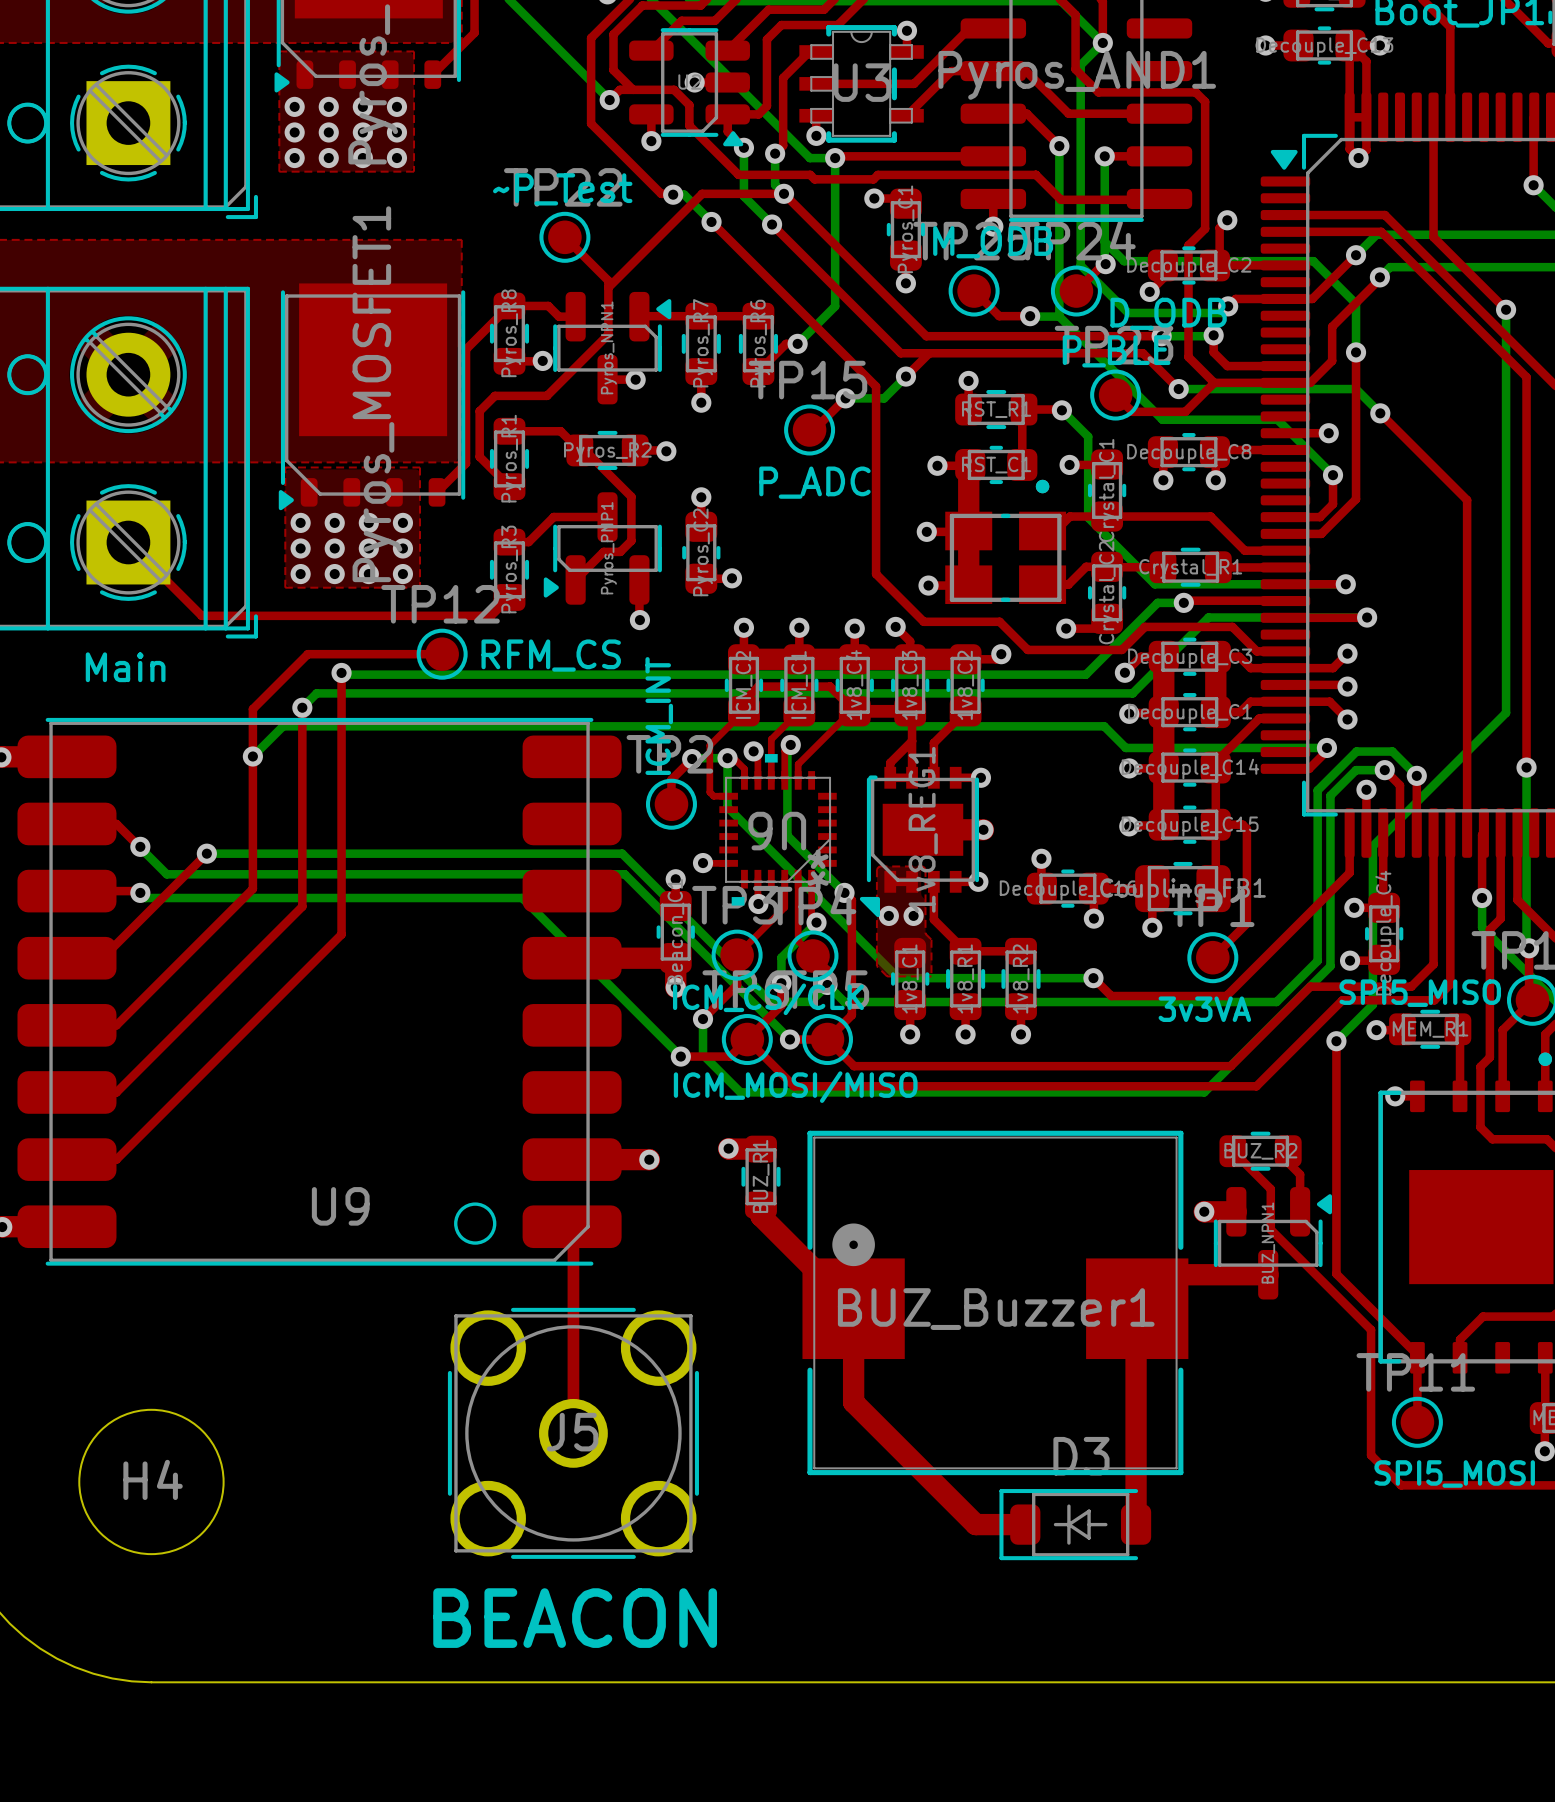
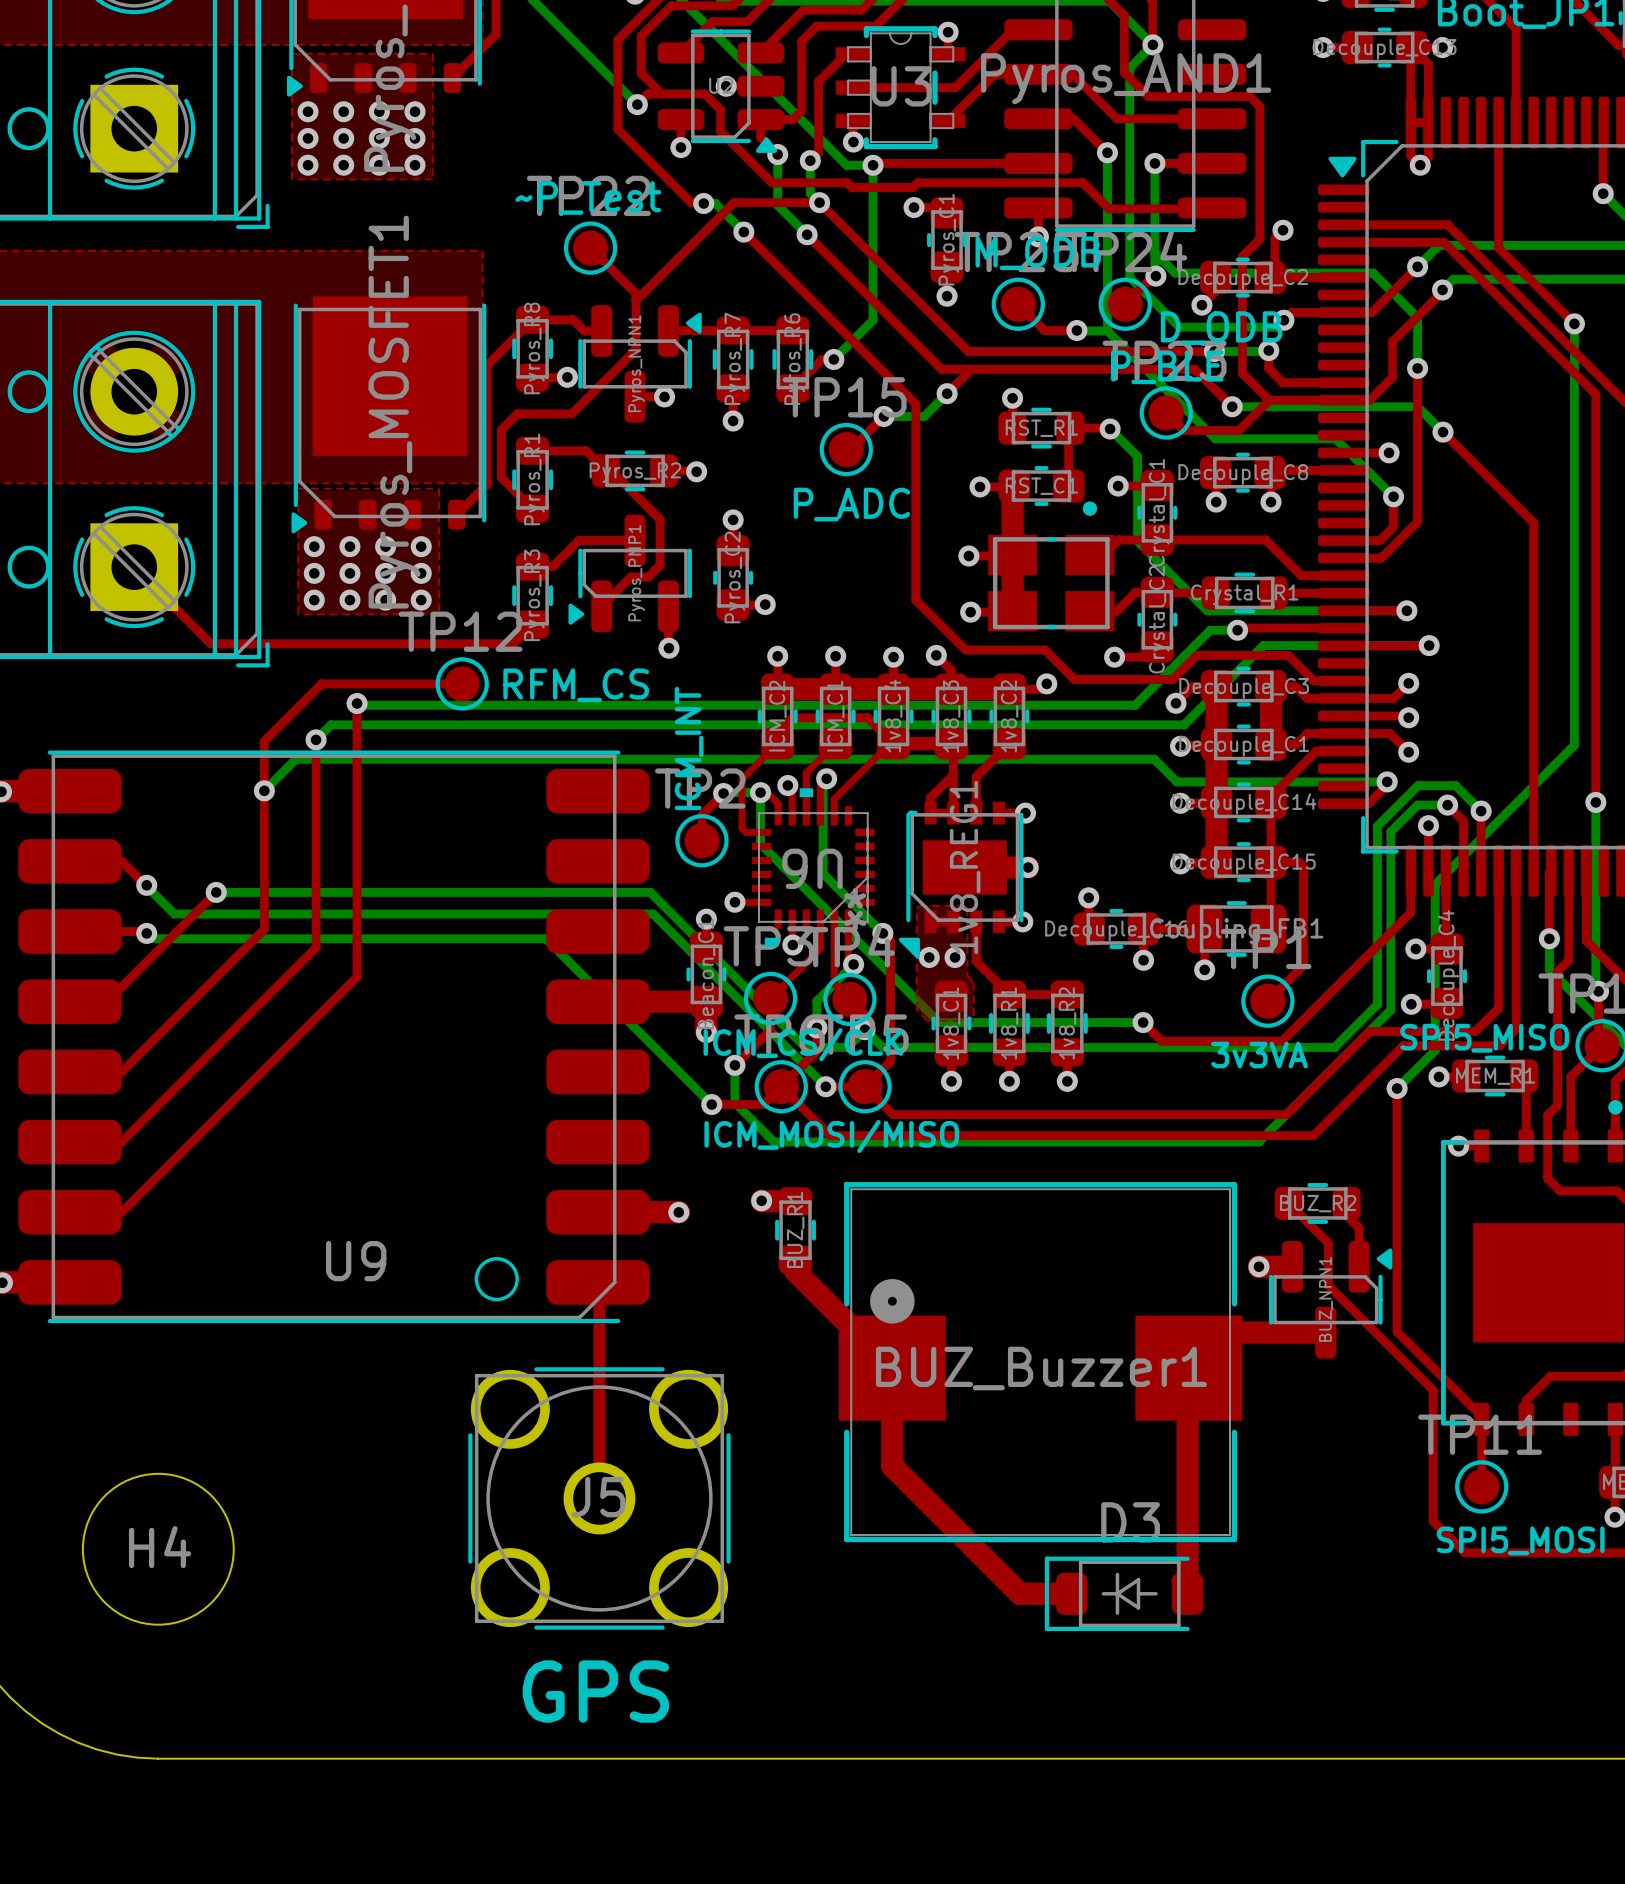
text: Main (125, 667) -> none
text: BEACON (575, 1618) -> GPS (595, 1691)

